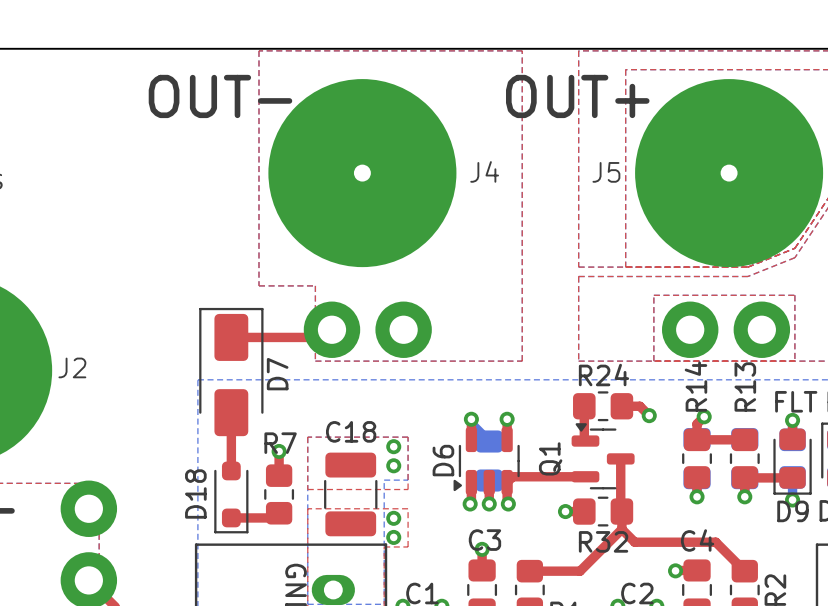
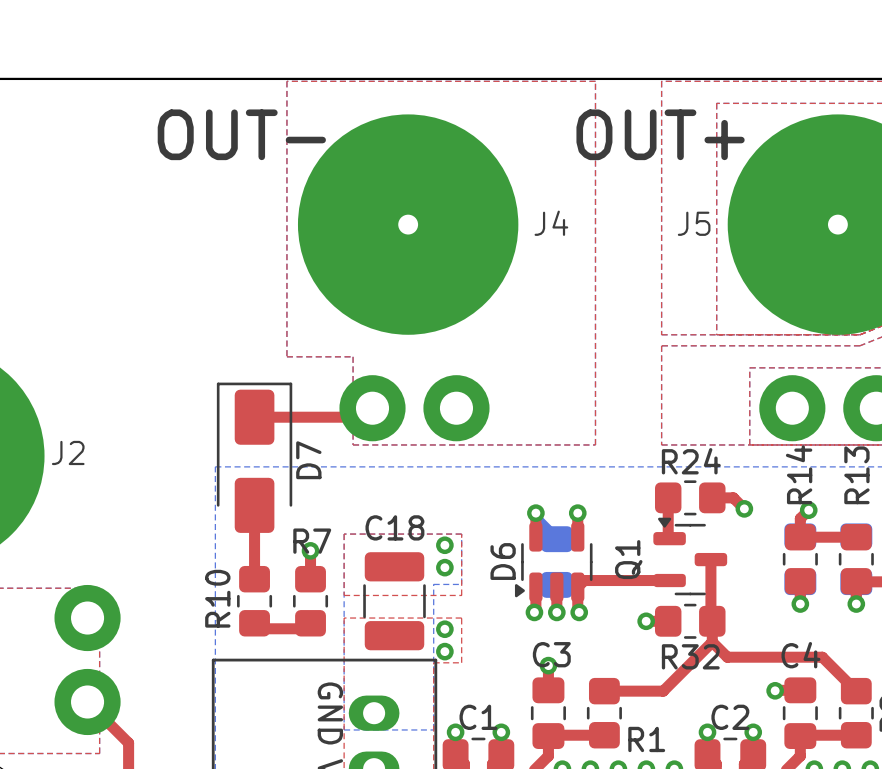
R10: none -> (254, 601)
D18: (231, 497) -> none

